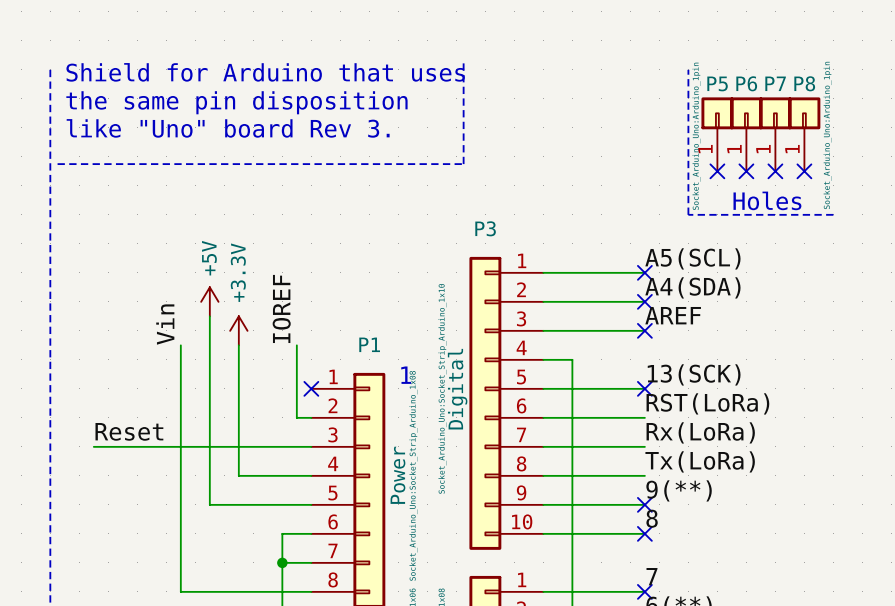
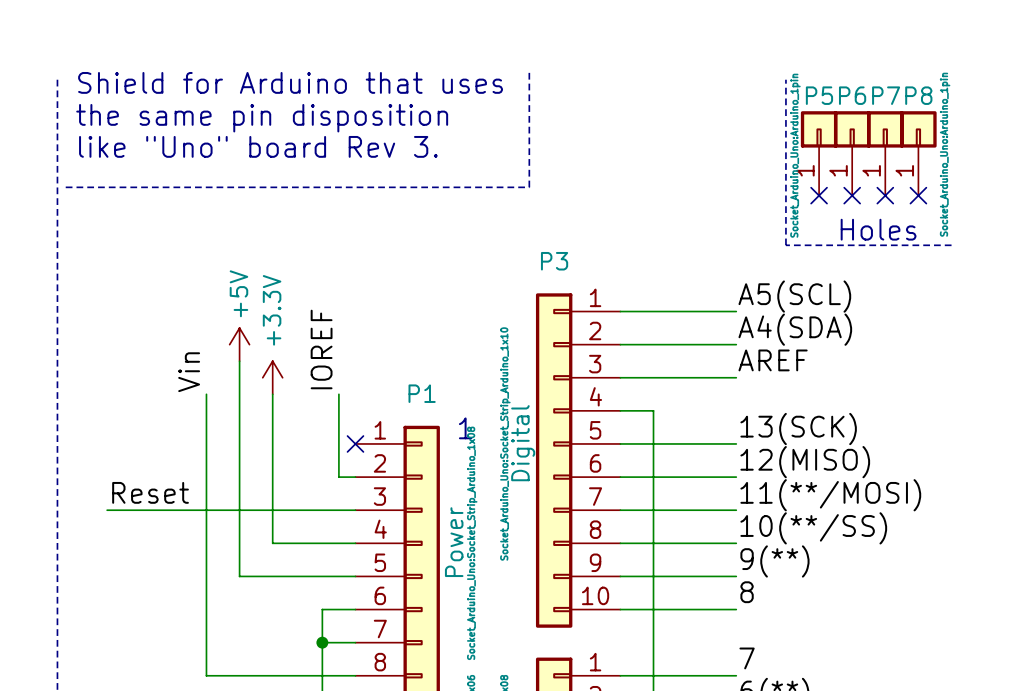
no-connect mark: (644, 272) -> none
no-connect mark: (644, 301) -> none
no-connect mark: (644, 330) -> none
no-connect mark: (644, 388) -> none
label: RST(LoRa) (707, 403) -> 12(MISO) (805, 462)
label: Rx(LoRa) (700, 432) -> 11(**/MOSI) (830, 495)
label: Tx(LoRa) (700, 461) -> 10(**/SS) (813, 528)
no-connect mark: (644, 504) -> none
no-connect mark: (644, 533) -> none
no-connect mark: (644, 591) -> none

